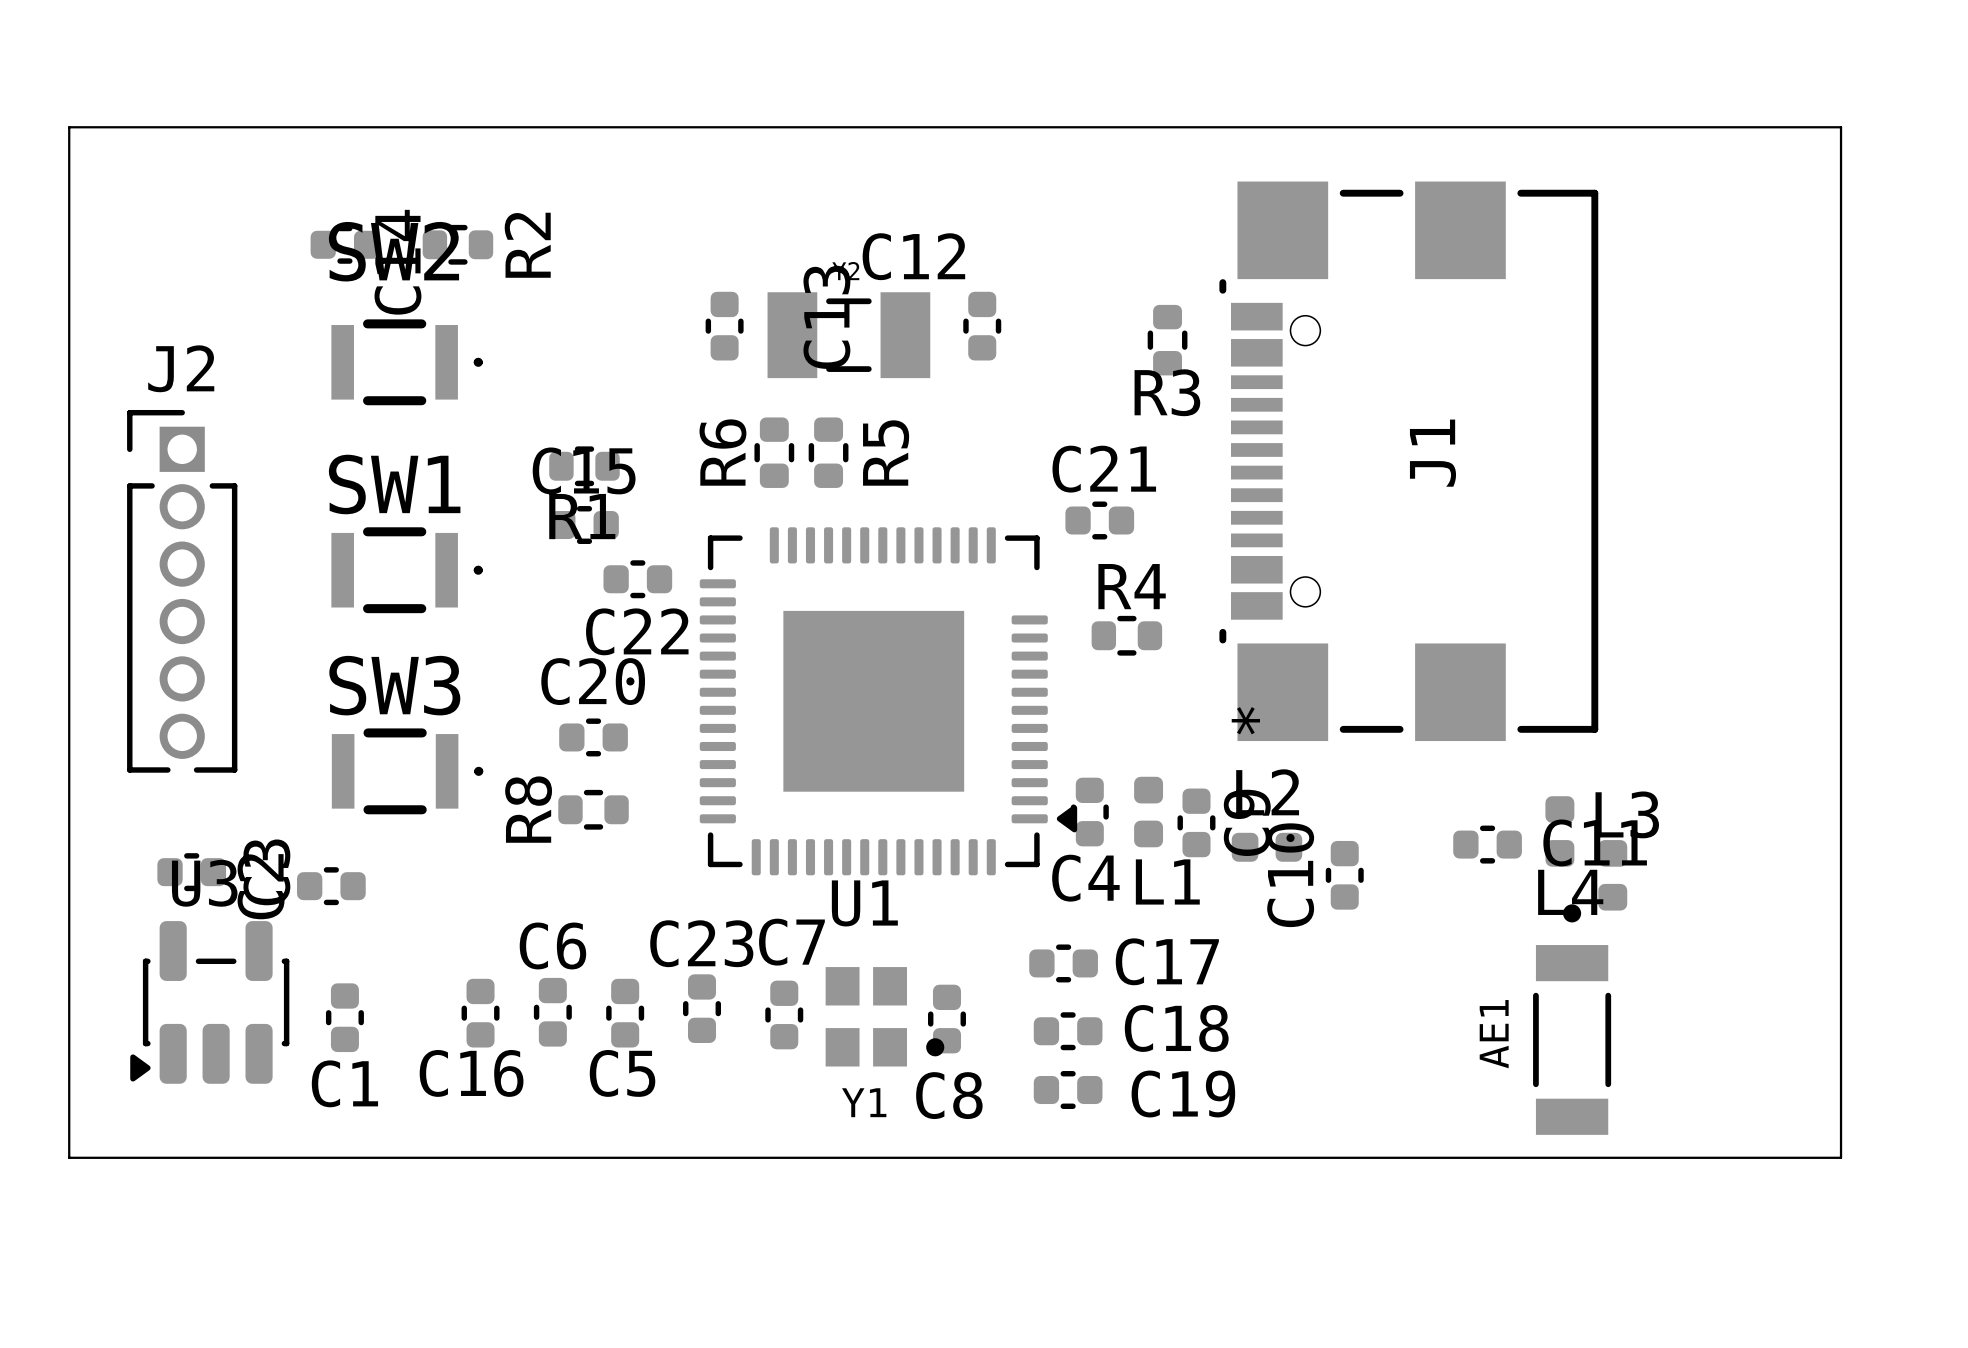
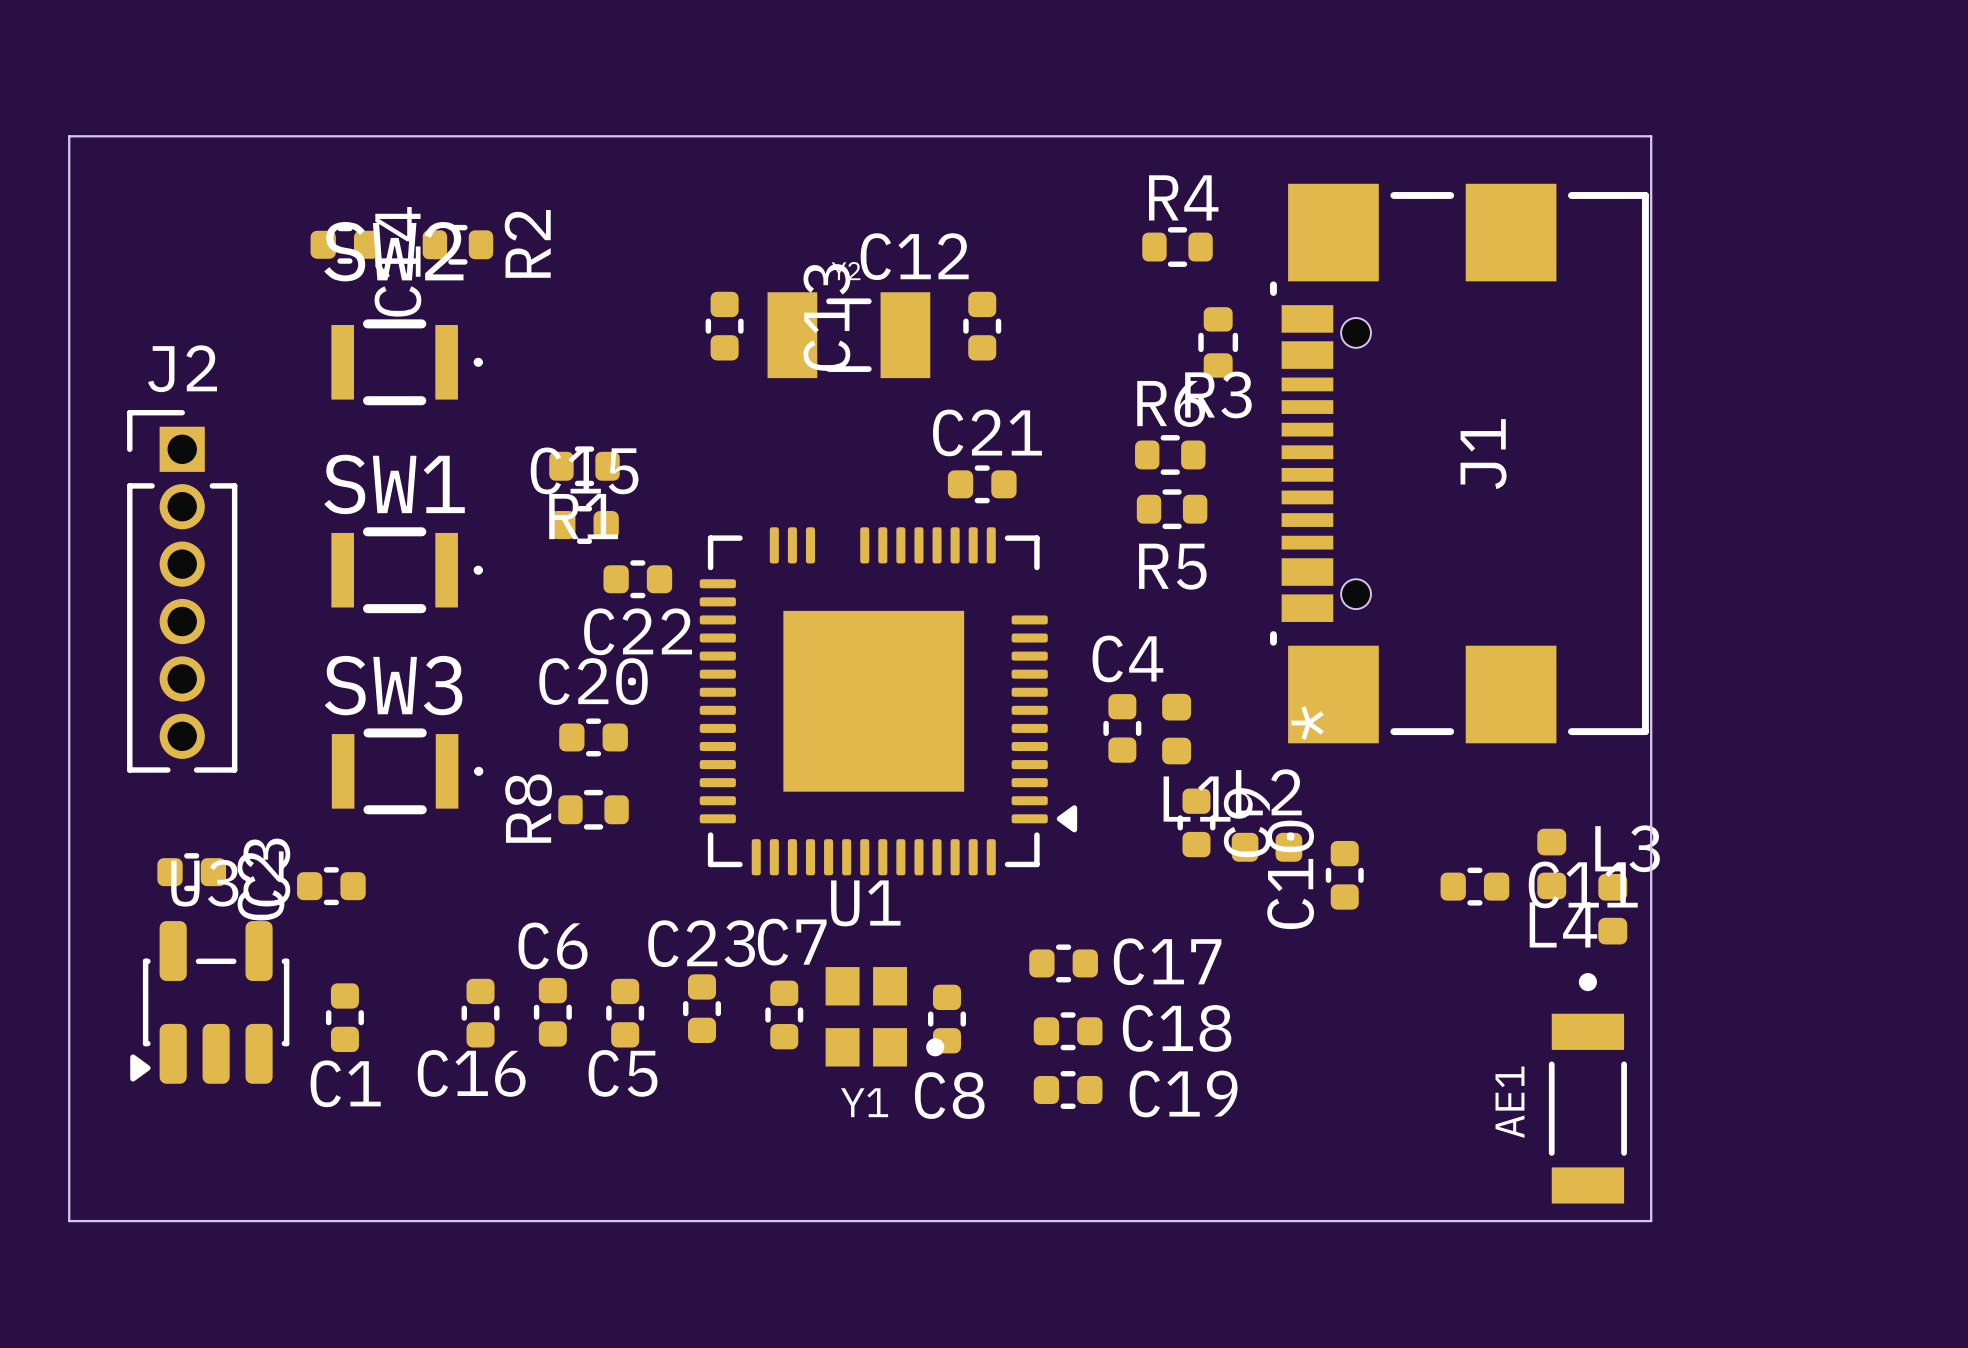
board edge: (69, 136) (69, 127) (1841, 127) (1841, 1157) (69, 1157) -> (69, 136) (1651, 136) (1651, 1221) (69, 1221) (69, 1157)
R3 position: (1167, 340) -> (1218, 342)
R6 rotation: 0° (774, 452) -> 90° clockwise (1170, 454)
R6 position: (774, 452) -> (1170, 454)
R5 rotation: 0° (828, 452) -> 90° clockwise (1172, 509)
R5 position: (828, 452) -> (1172, 509)
J1 position: (1408, 461) -> (1459, 463)
C21 position: (1099, 520) -> (982, 484)
U1 footprint: [699, 527, 1078, 876] -> [699, 527, 1078, 876]
R4 position: (1126, 635) -> (1177, 247)
C4 position: (1089, 812) -> (1122, 728)
L1 position: (1148, 812) -> (1176, 729)
L4 position: (1559, 831) -> (1551, 864)
C11 position: (1487, 844) -> (1474, 886)
L3 position: (1612, 875) -> (1612, 909)
C4 name position: C4 (1085, 878) -> C4 (1127, 658)
AE1 position: (1572, 1019) -> (1587, 1088)

